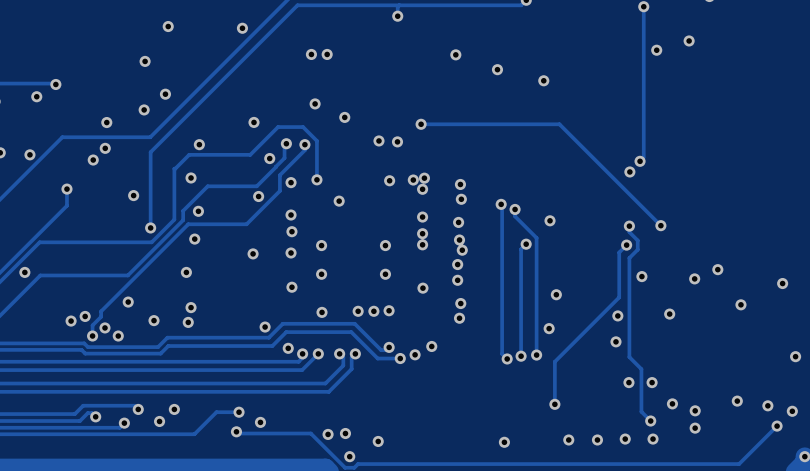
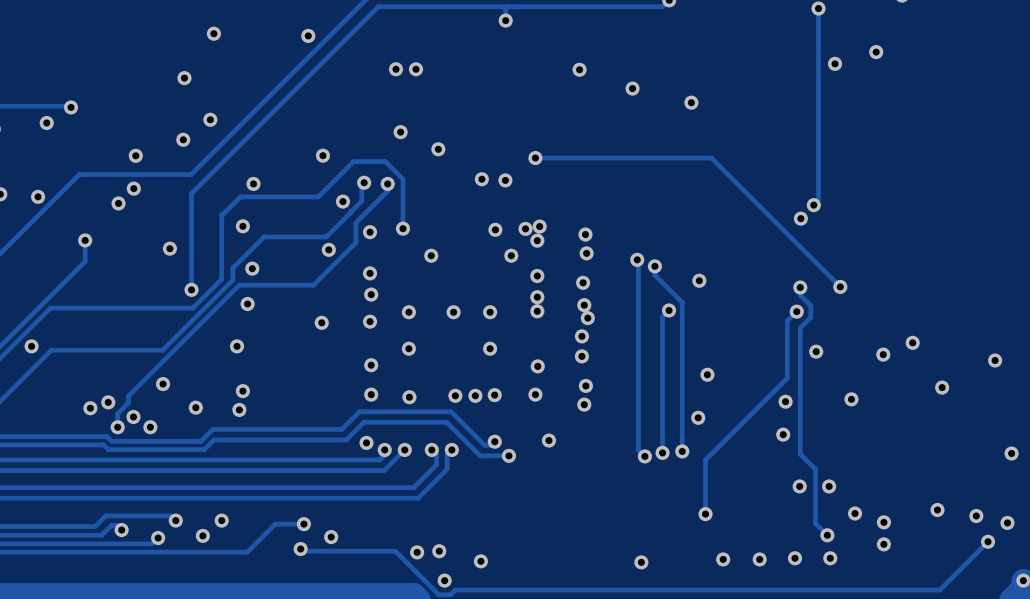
via: none -> (511, 255)
via: none -> (453, 312)
via position: (265, 327) -> (371, 394)
via position: (415, 354) -> (535, 394)

